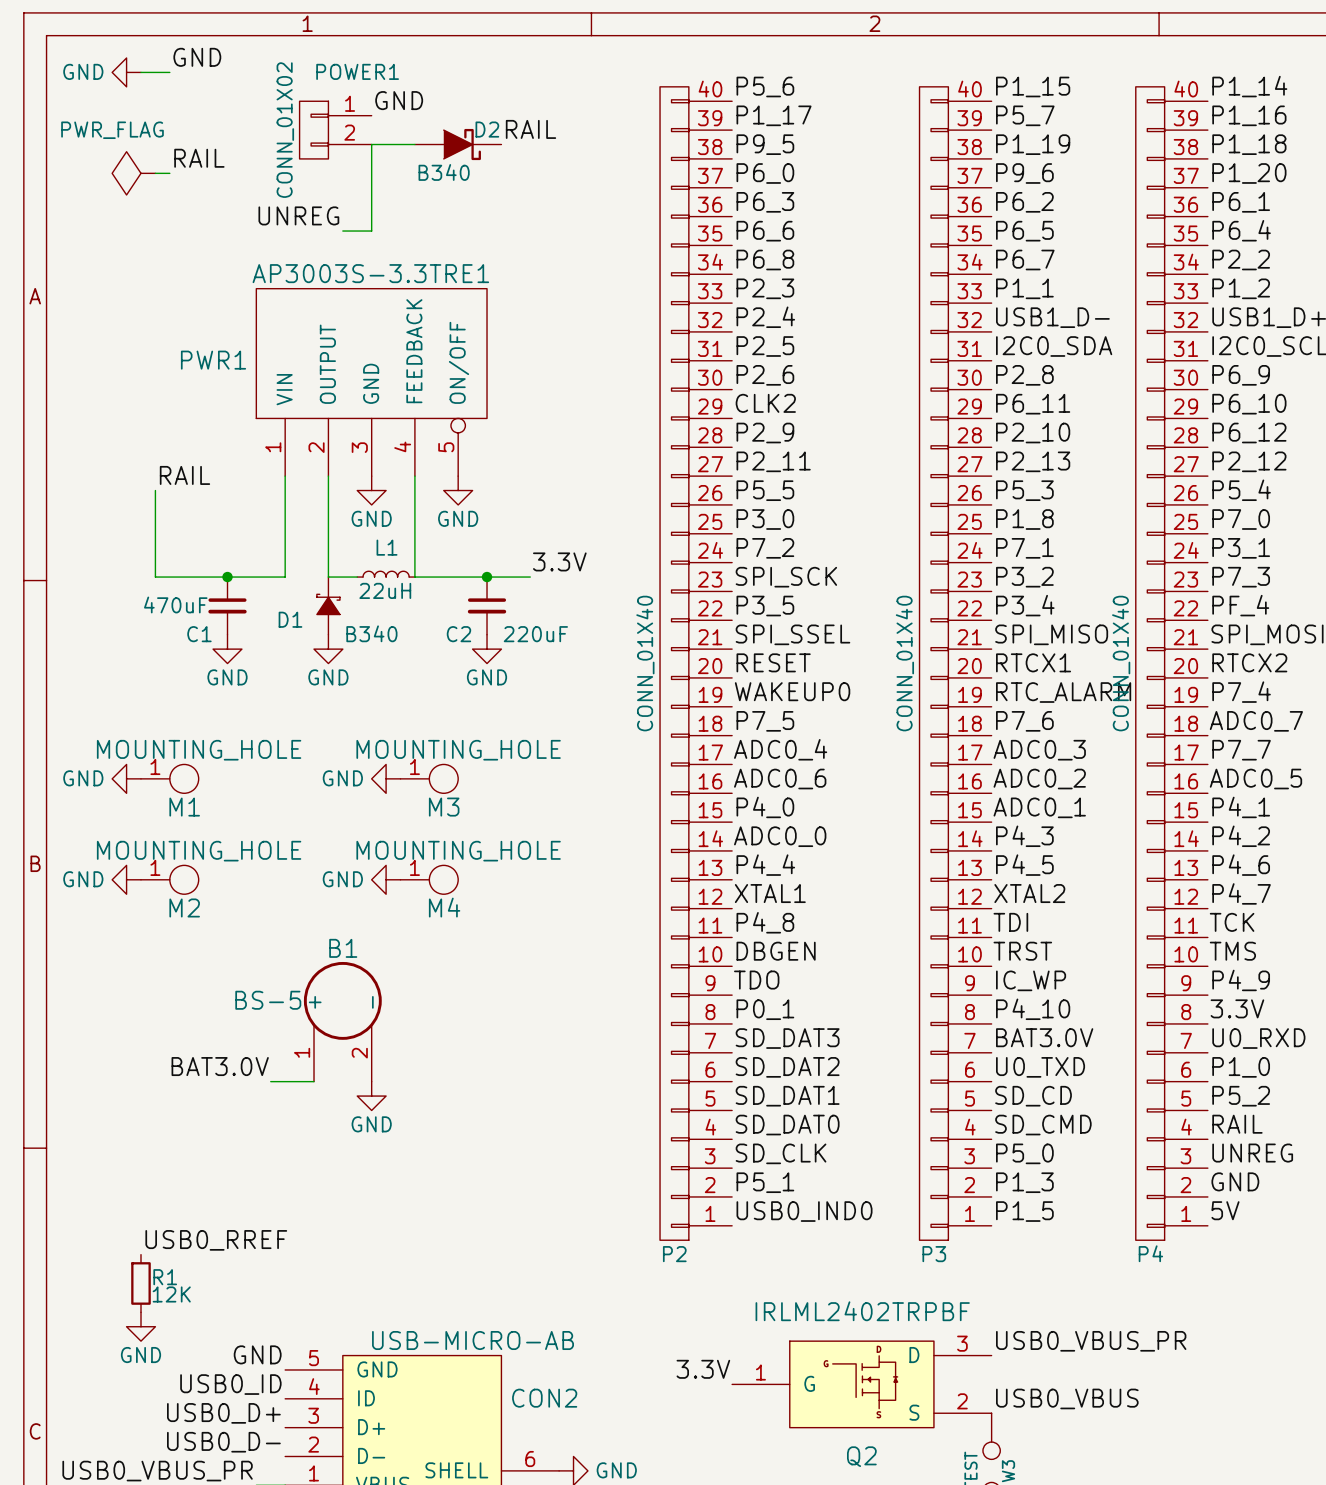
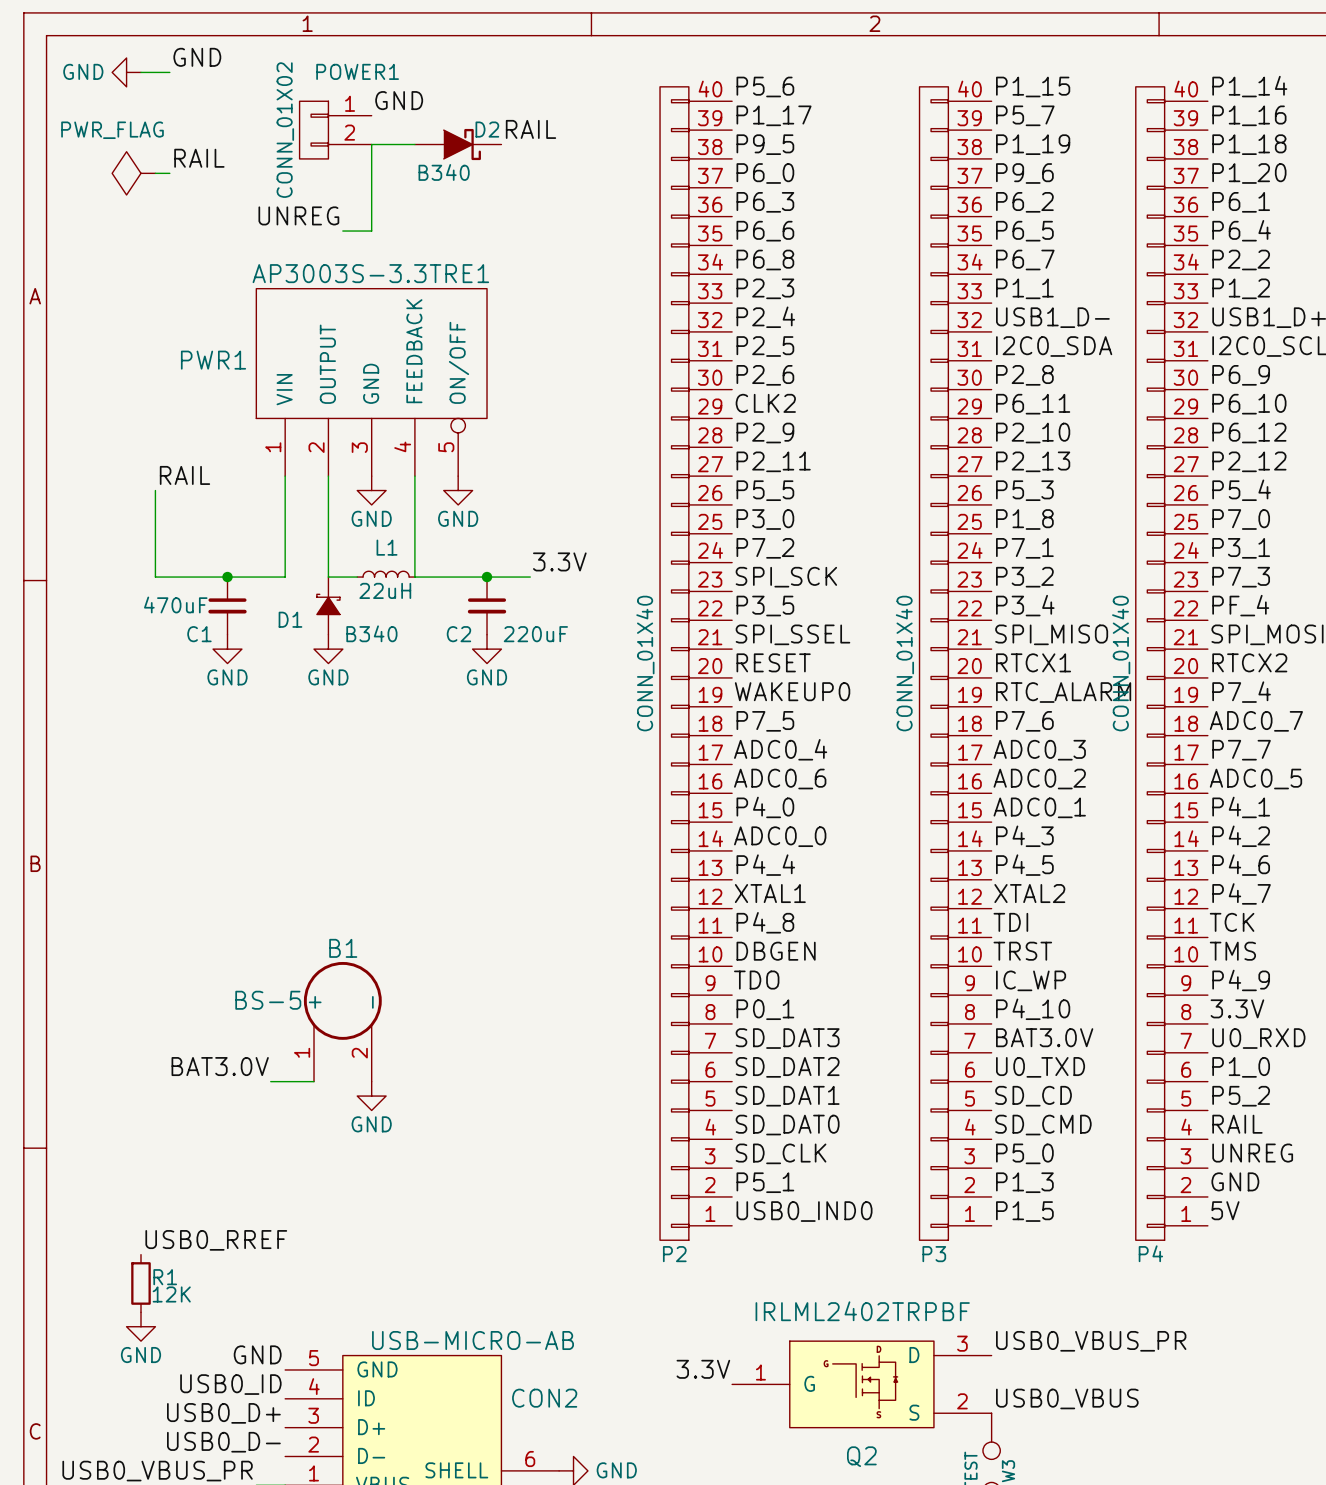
power symbol: GND (126, 778) -> none
M1: MOUNTING_HOLE (169, 778) -> none
power symbol: GND (386, 778) -> none
M3: MOUNTING_HOLE (429, 778) -> none
power symbol: GND (126, 879) -> none
M2: MOUNTING_HOLE (169, 879) -> none
power symbol: GND (386, 879) -> none
M4: MOUNTING_HOLE (429, 879) -> none

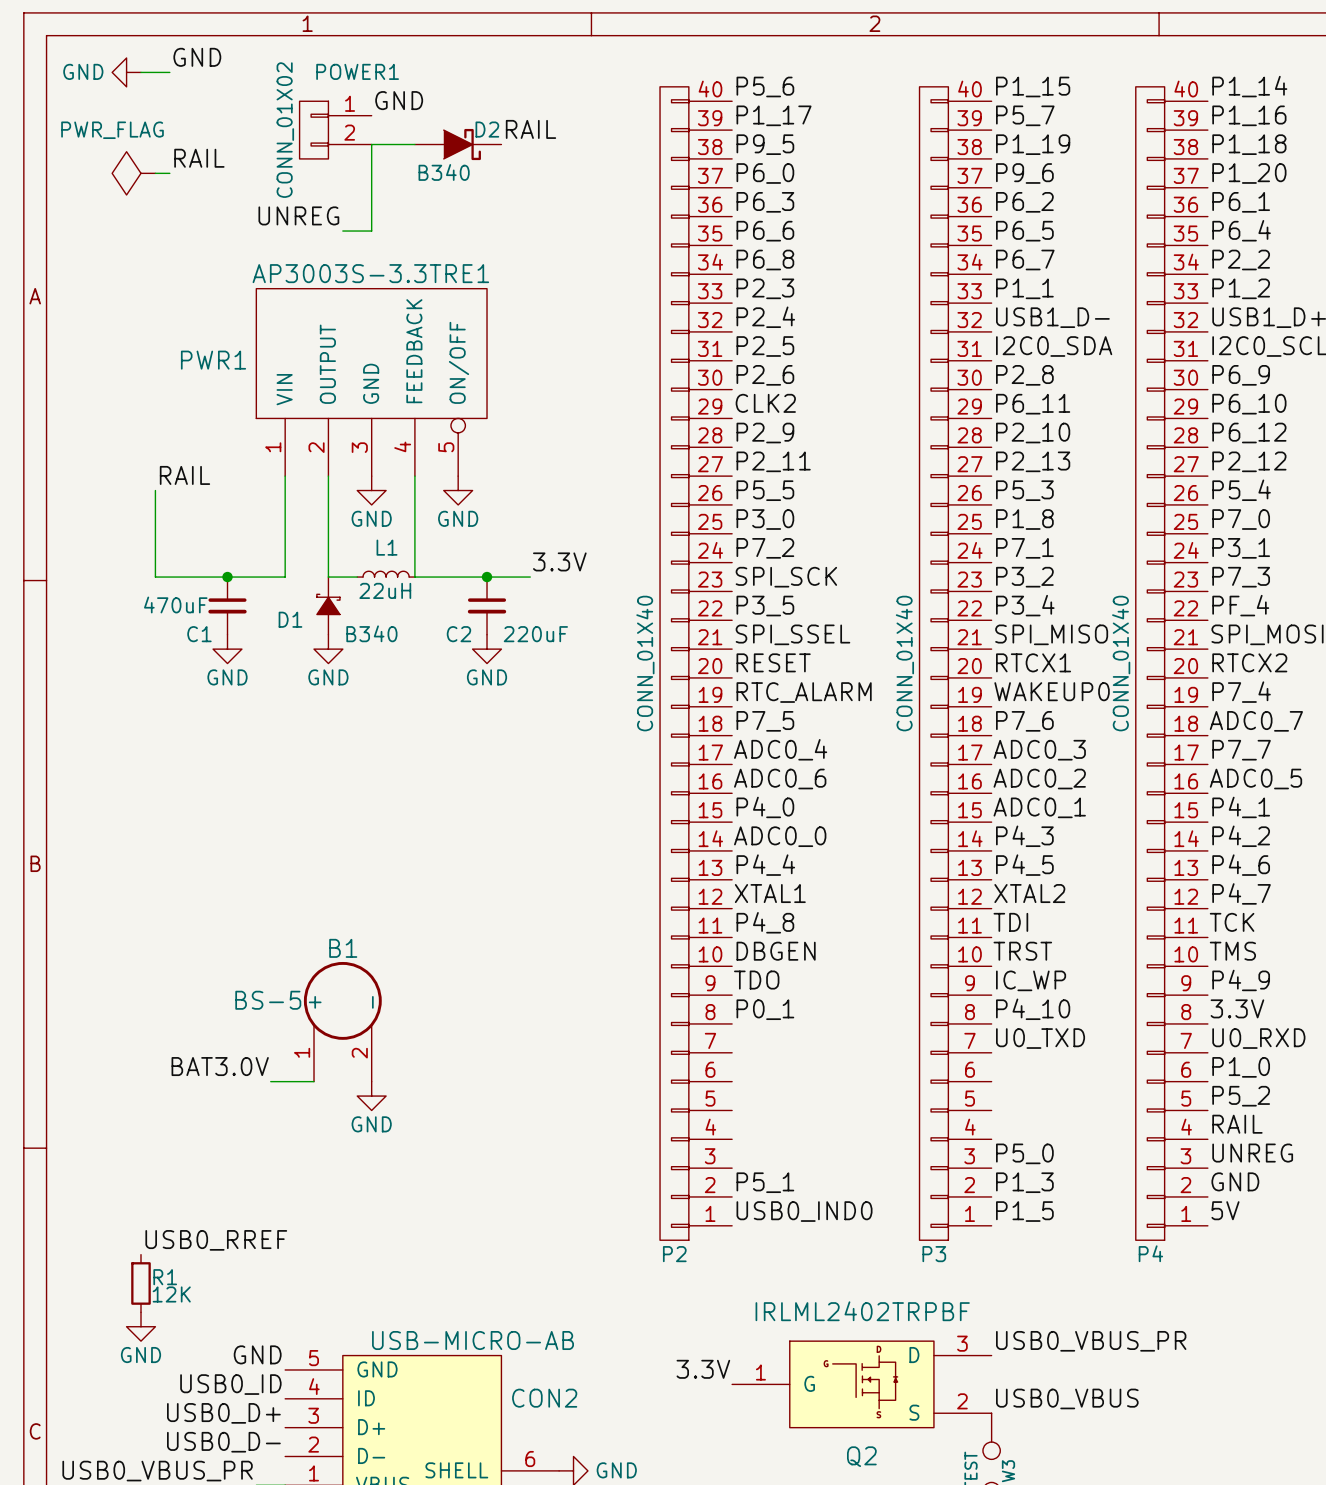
label: WAKEUP0 (792, 691) -> RTC_ALARM (804, 692)
label: RTC_ALARM (1063, 692) -> WAKEUP0 (1052, 691)
label: BAT3.0V (1044, 1037) -> U0_TXD (1040, 1038)
label: SD_DAT3 (787, 1038) -> none
label: SD_DAT2 (787, 1067) -> none
label: U0_TXD (1040, 1067) -> none
label: SD_DAT1 (787, 1096) -> none
label: SD_CD (1033, 1096) -> none
label: SD_DAT0 (787, 1125) -> none
label: SD_CMD (1043, 1125) -> none
label: SD_CLK (781, 1153) -> none

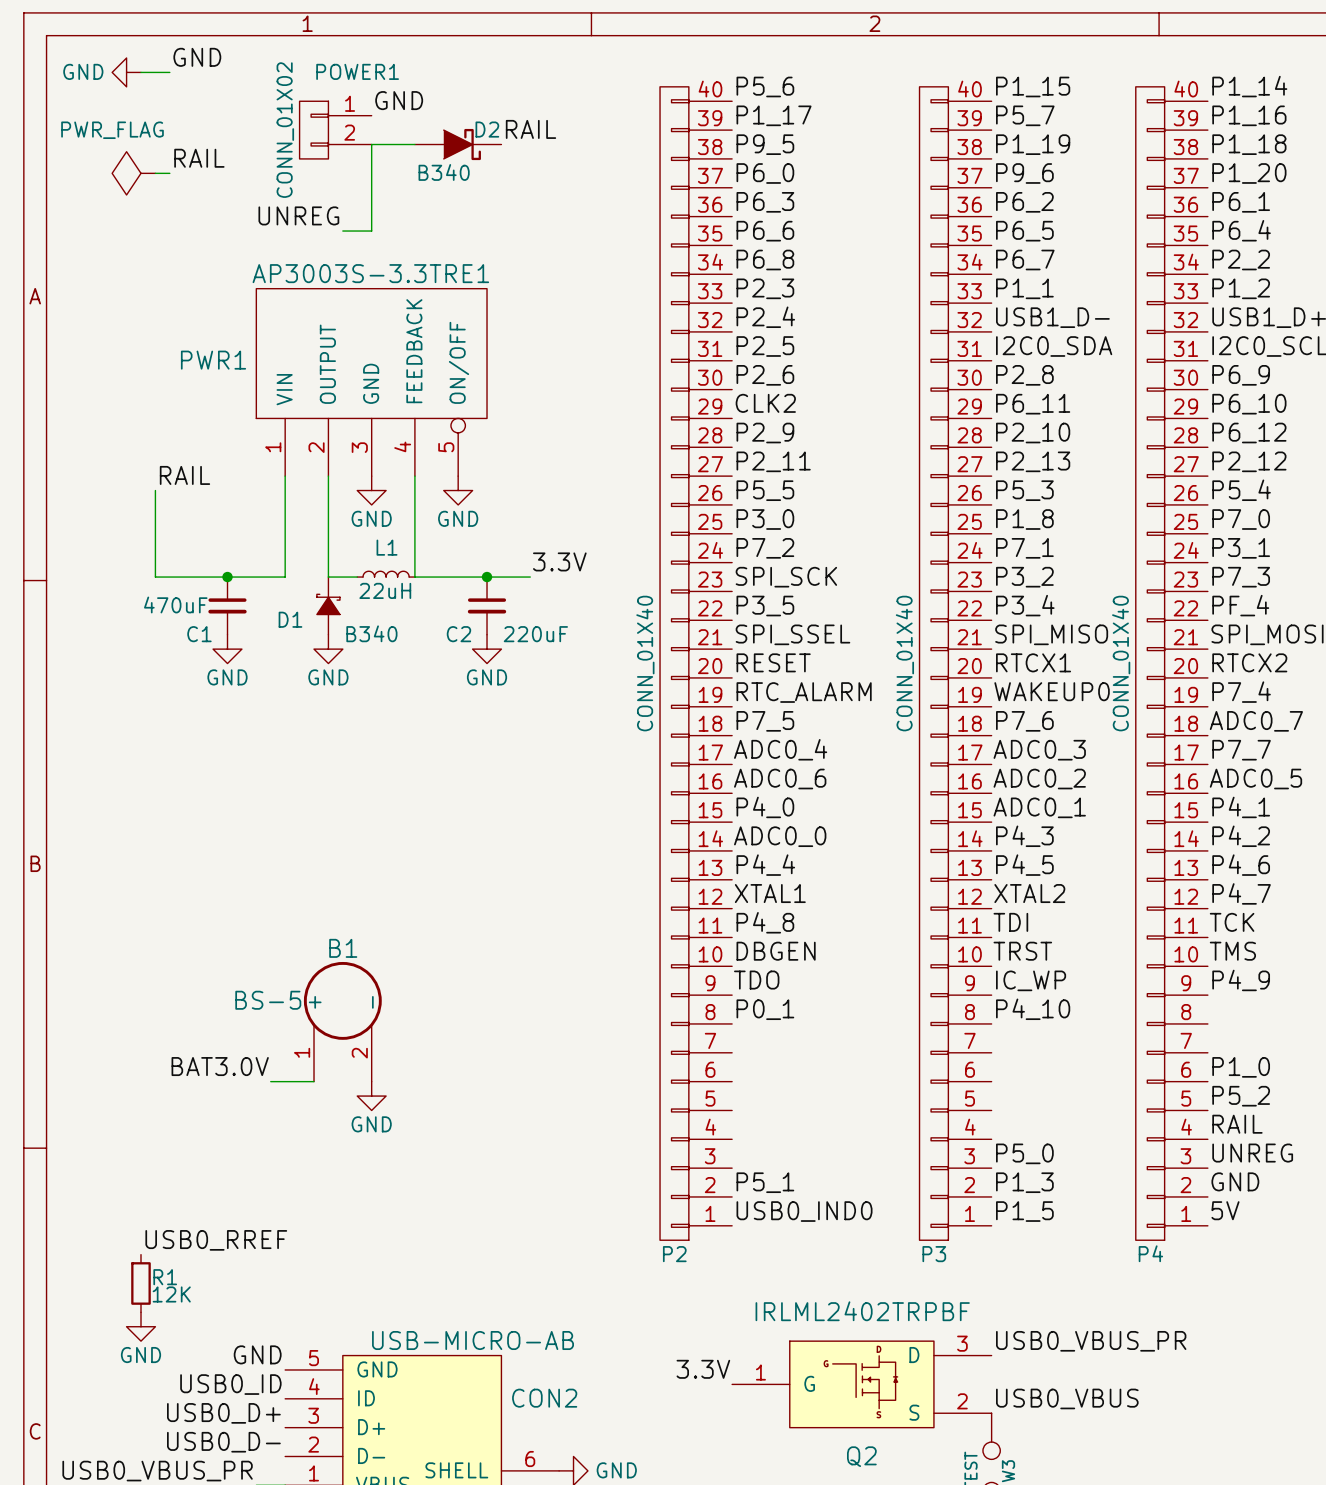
label: 3.3V (1237, 1008) -> none
label: U0_TXD (1040, 1038) -> none
label: U0_RXD (1258, 1038) -> none

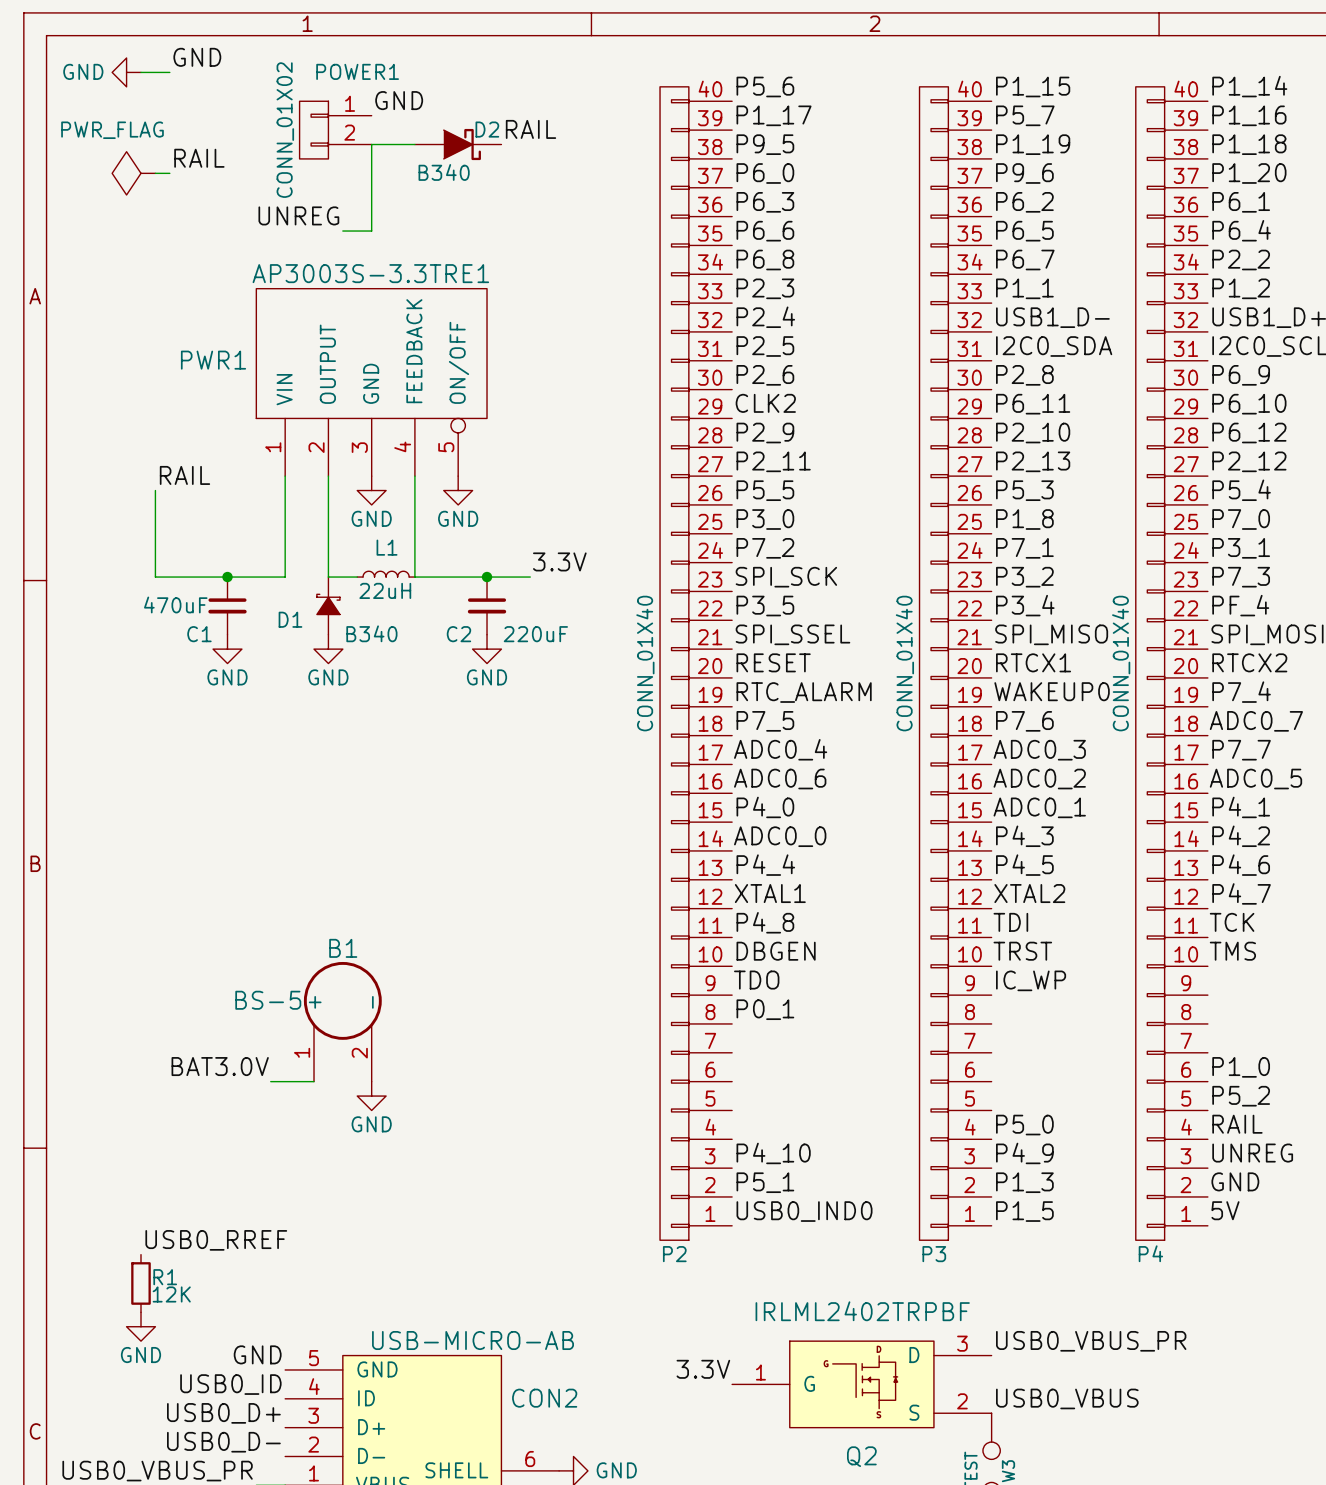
label: P4_9 (1241, 980) -> none
label: P4_10 (1033, 1009) -> none
label: none -> P5_0 (1024, 1125)
label: none -> P4_10 (773, 1153)
label: P5_0 (1024, 1153) -> P4_9 (1024, 1153)

